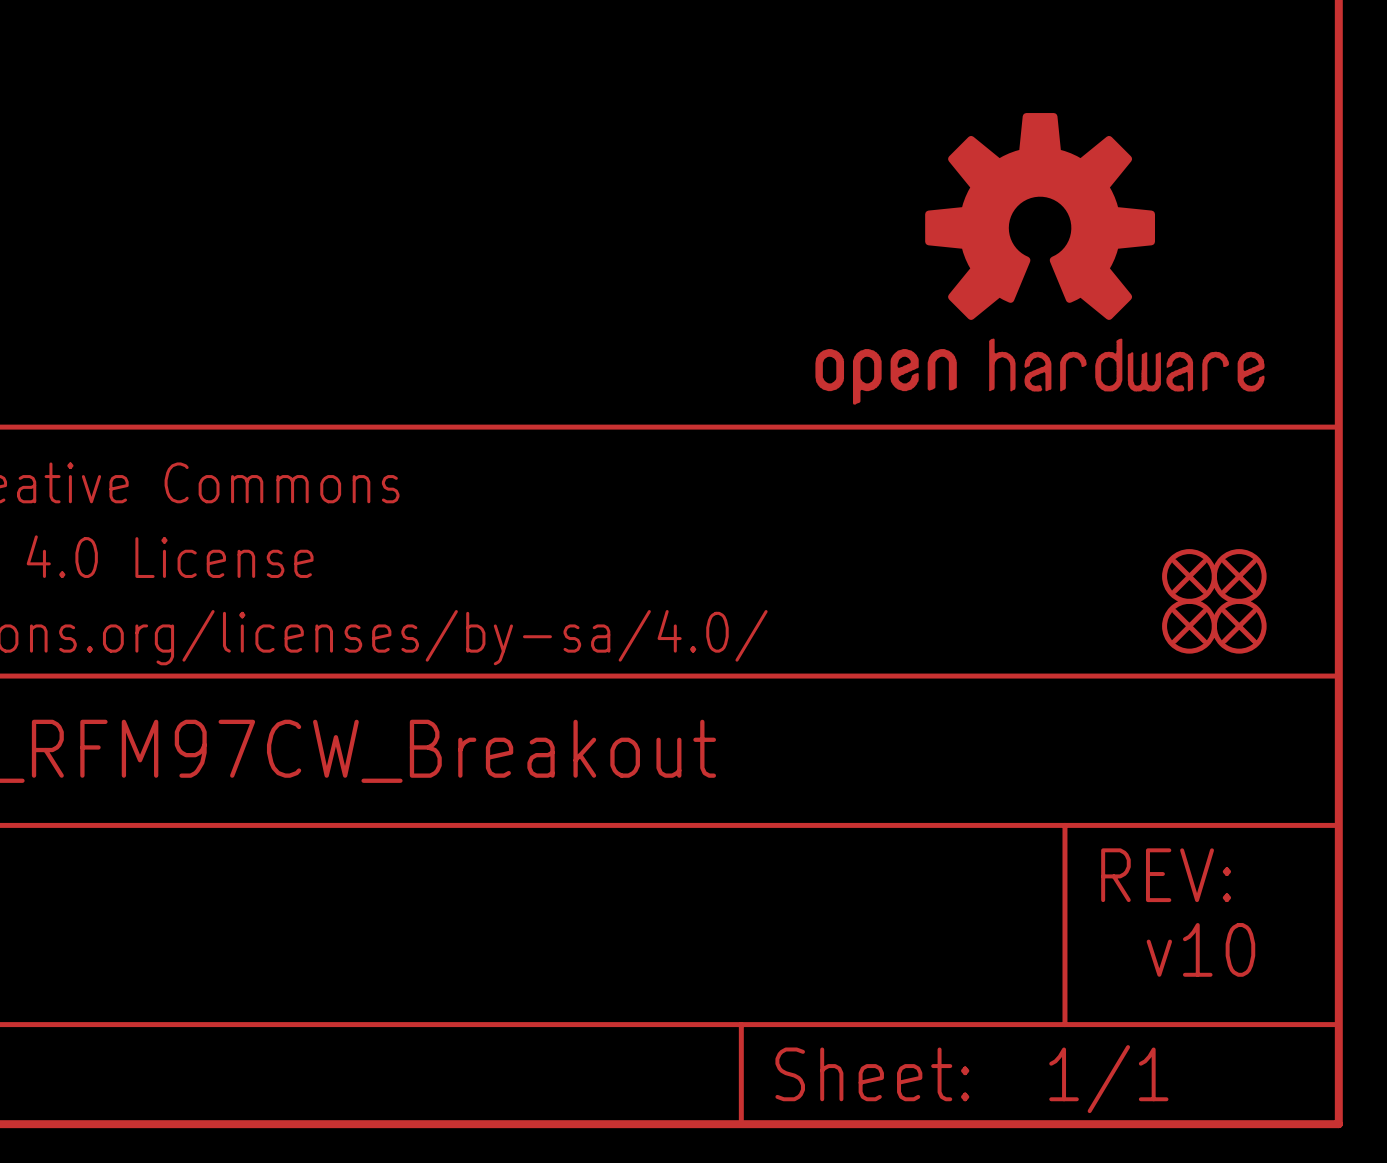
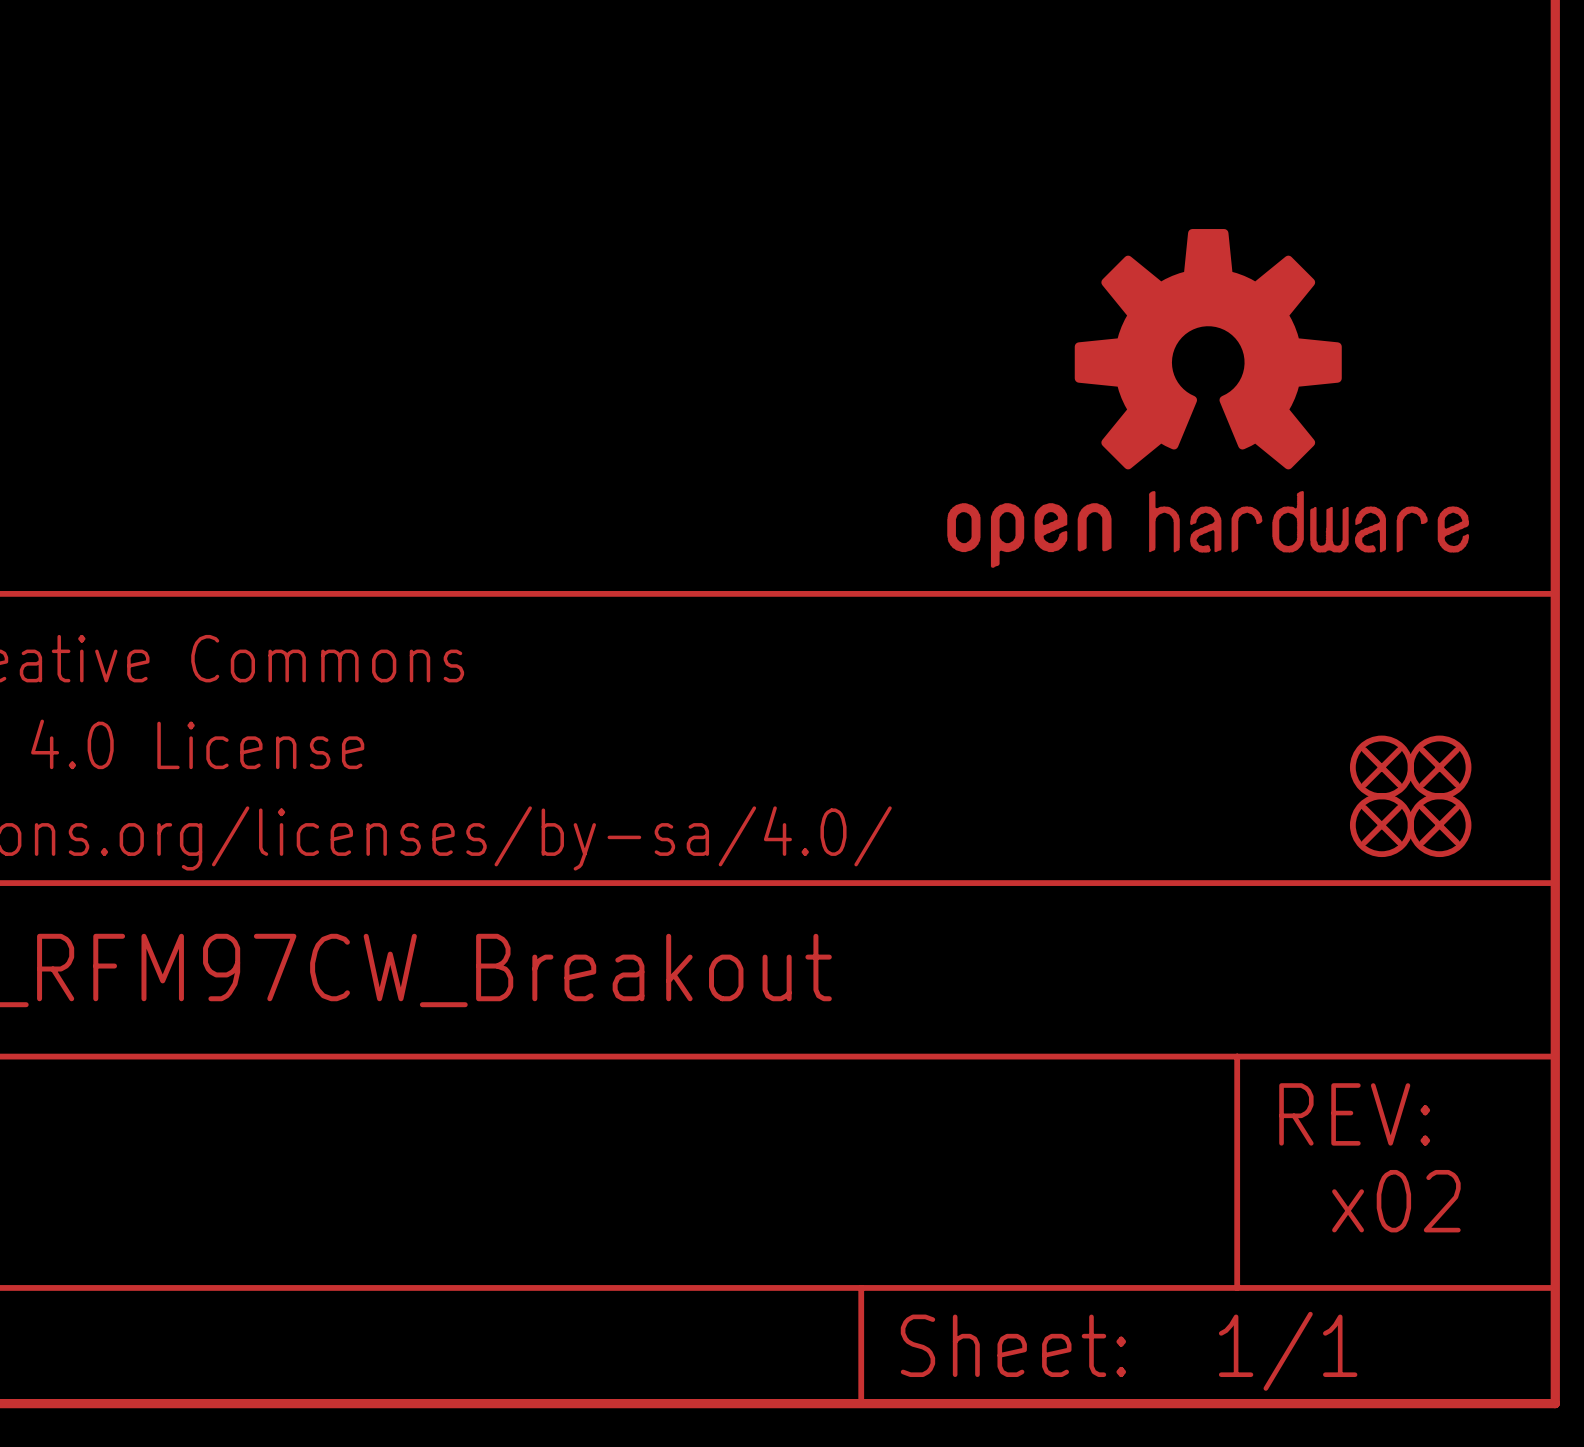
text: v10 (1200, 949) -> x02 (1396, 1201)

